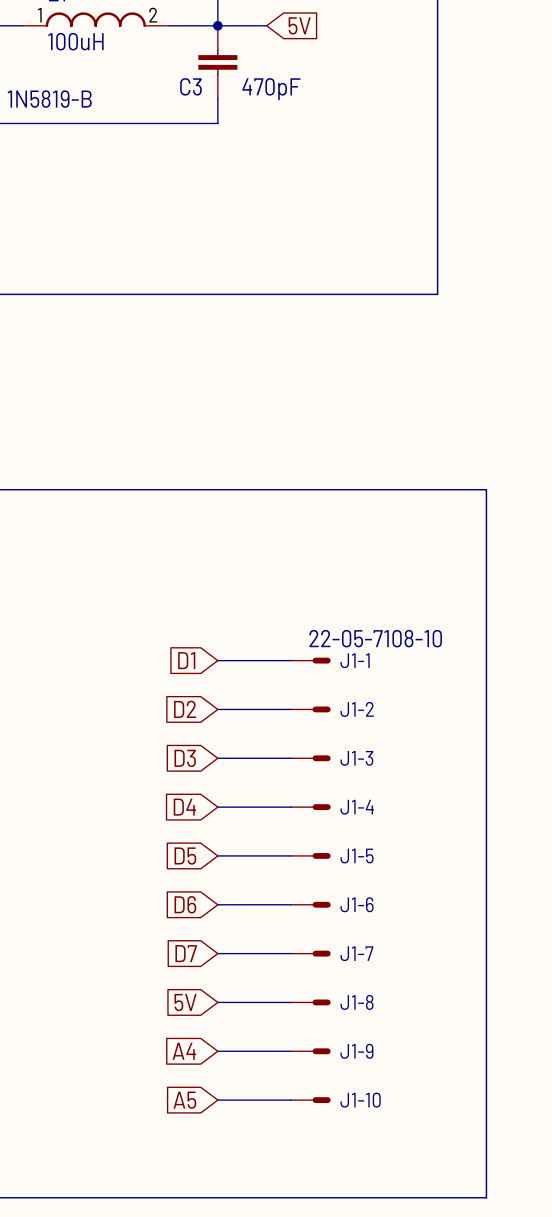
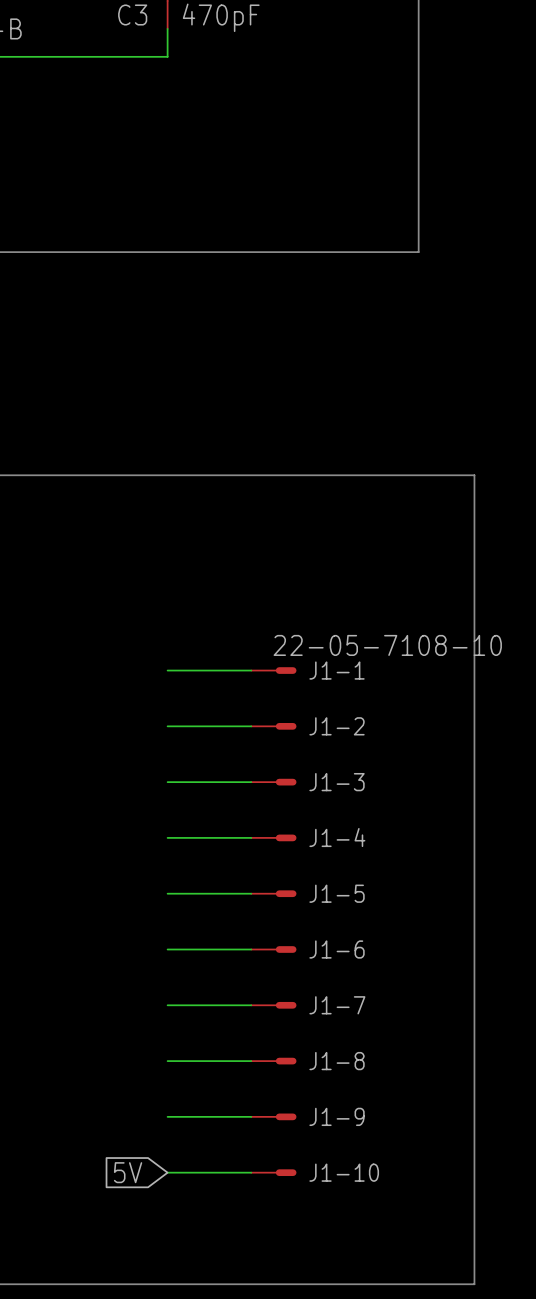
global label: D1 (186, 660) -> none
global label: D2 (185, 709) -> none
global label: D3 (185, 758) -> none
global label: D4 (184, 807) -> none
global label: D5 (185, 856) -> none
global label: D6 (185, 904) -> none
global label: D7 (186, 953) -> none
global label: 5V (185, 1002) -> none
global label: A4 (184, 1051) -> none
global label: A5 (184, 1100) -> 5V (128, 1172)

